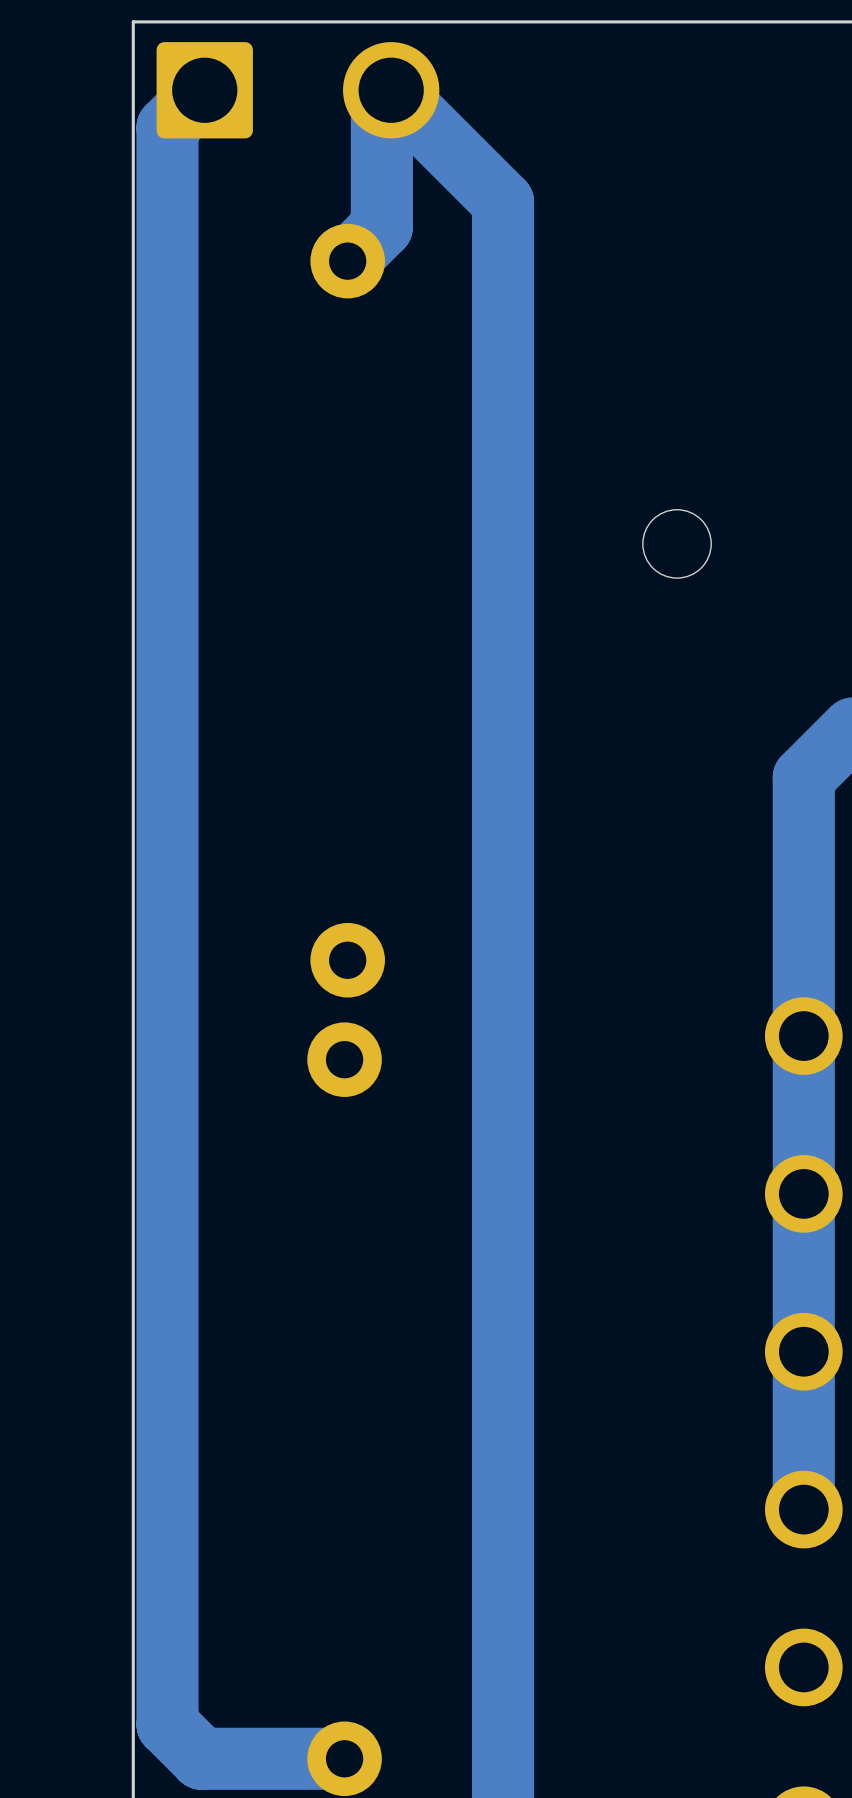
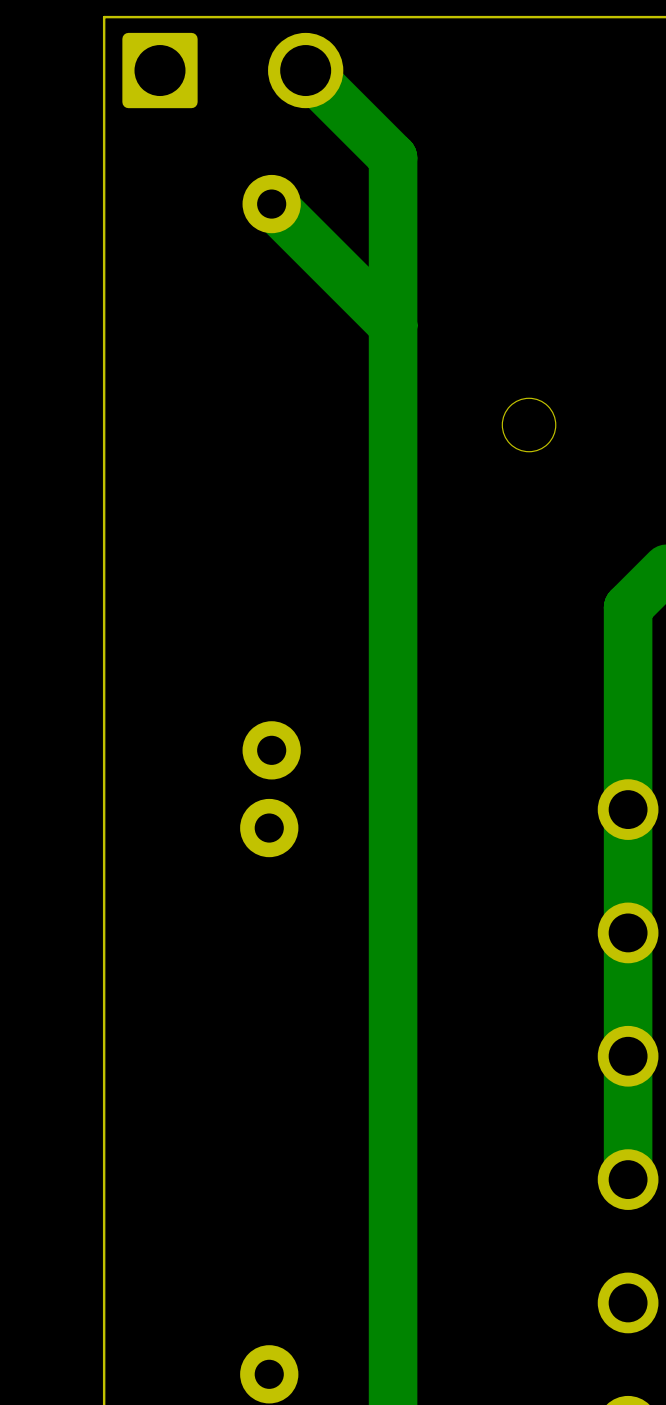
track: (204, 90) (167, 127) (167, 1724) (201, 1758) (344, 1758) -> none
track: (381, 99) (381, 226) (347, 261) -> (393, 325) (271, 204)

